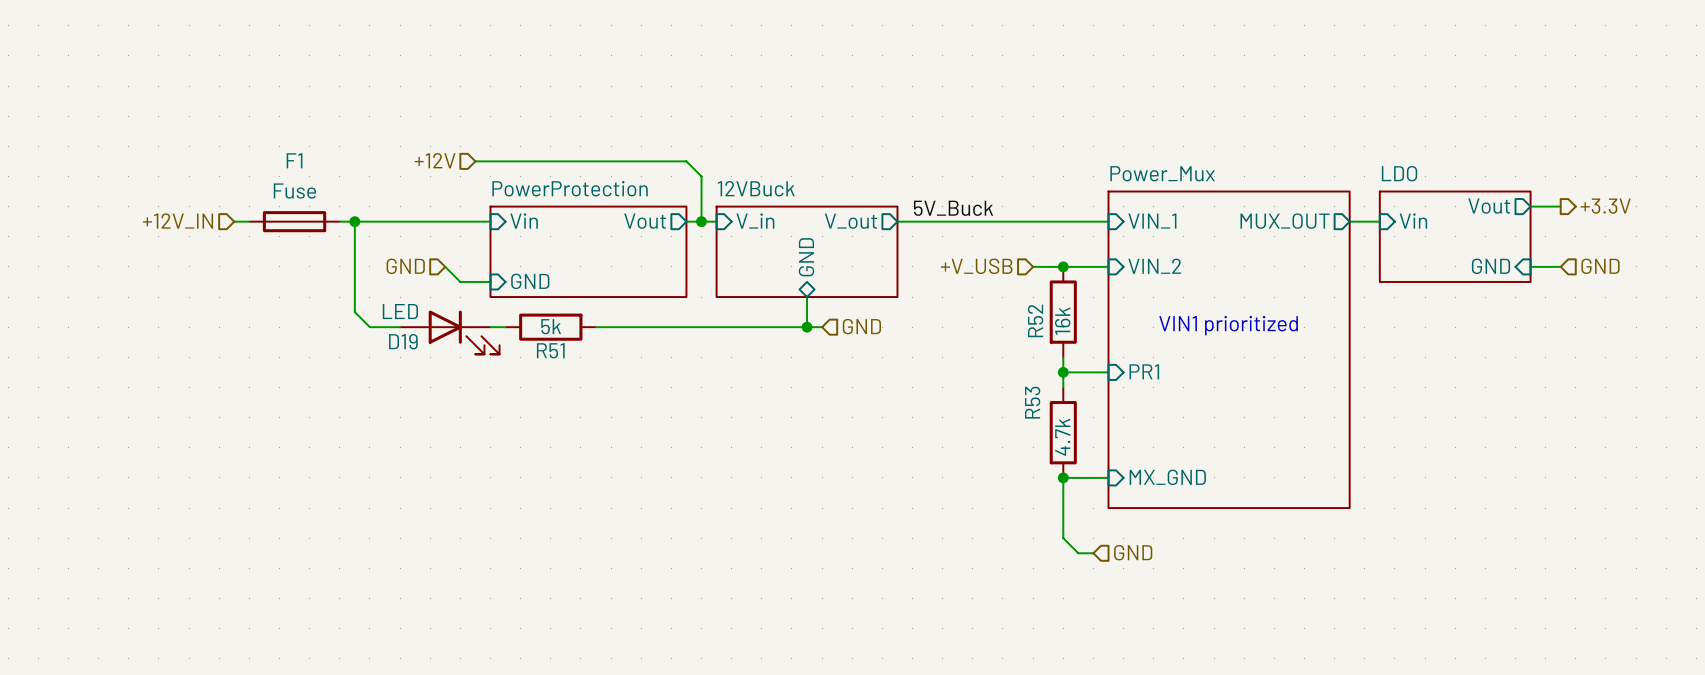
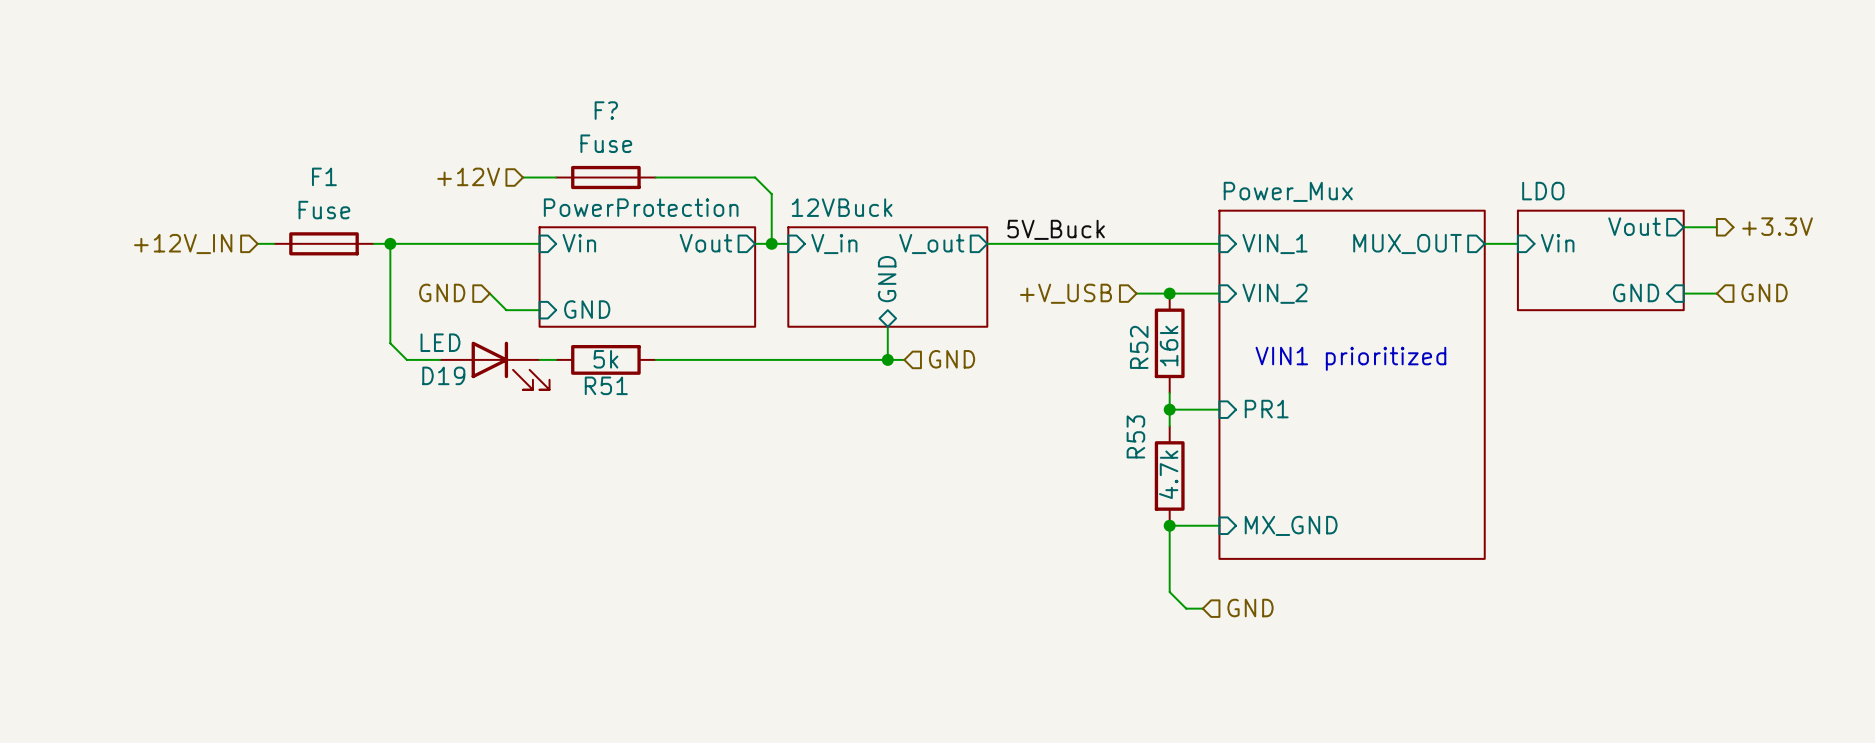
F?: none -> Fuse (605, 177)

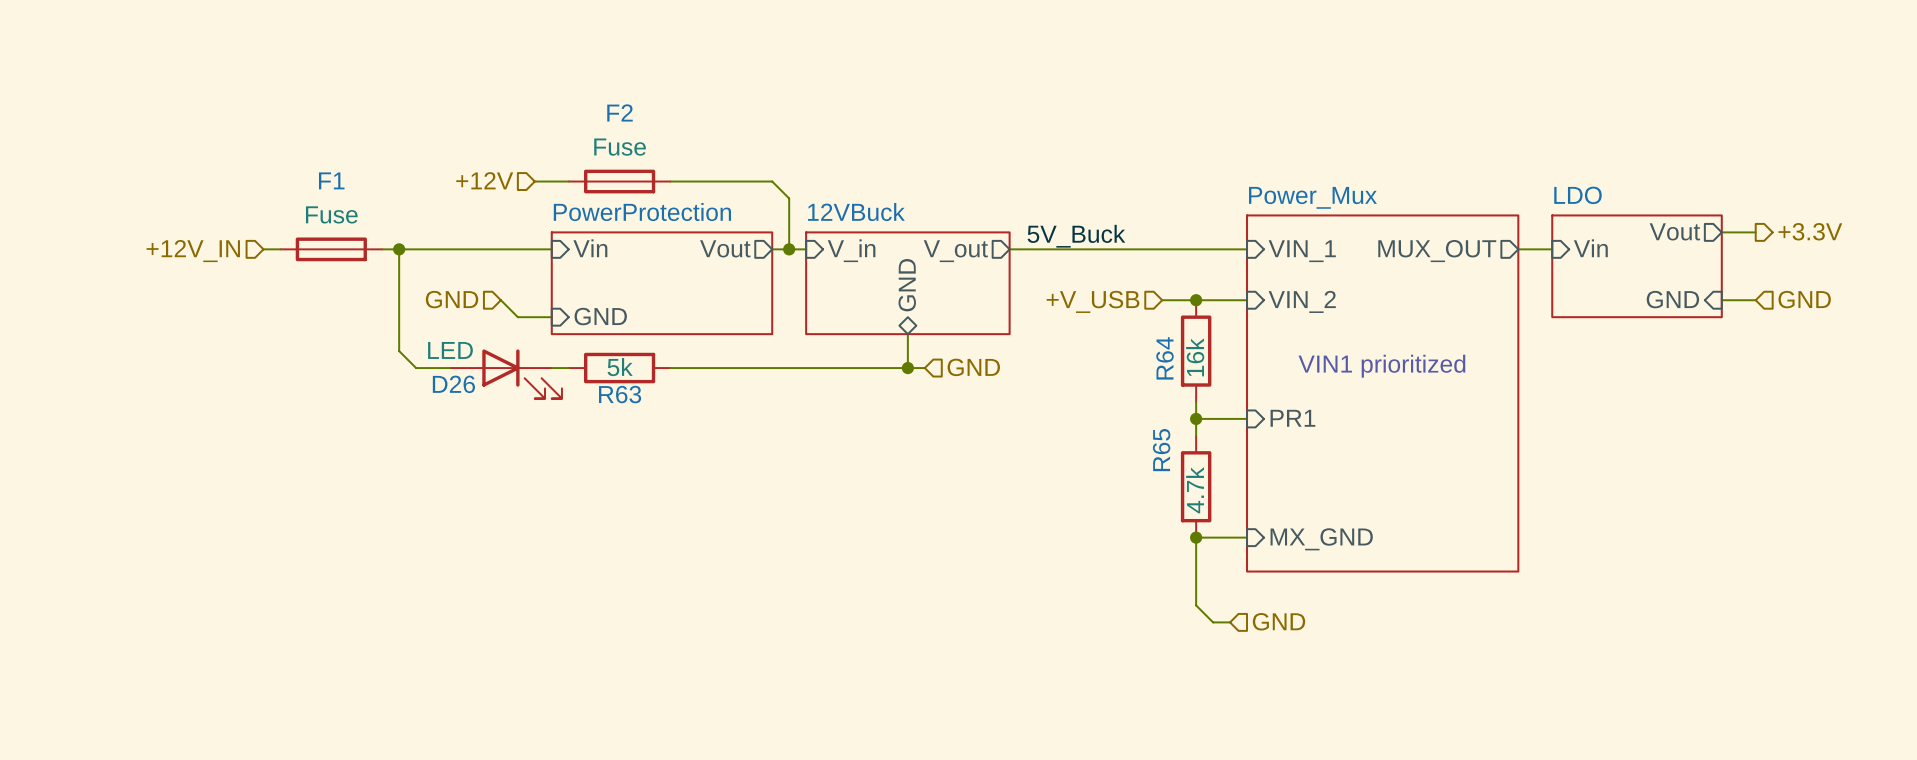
F? name: F? (606, 110) -> F2 (620, 112)
R52 name: R52 (1139, 347) -> R64 (1164, 358)
D19 name: D19 (443, 375) -> D26 (453, 384)
R51 name: R51 (606, 385) -> R63 (620, 394)
R53 name: R53 (1135, 436) -> R65 (1161, 450)

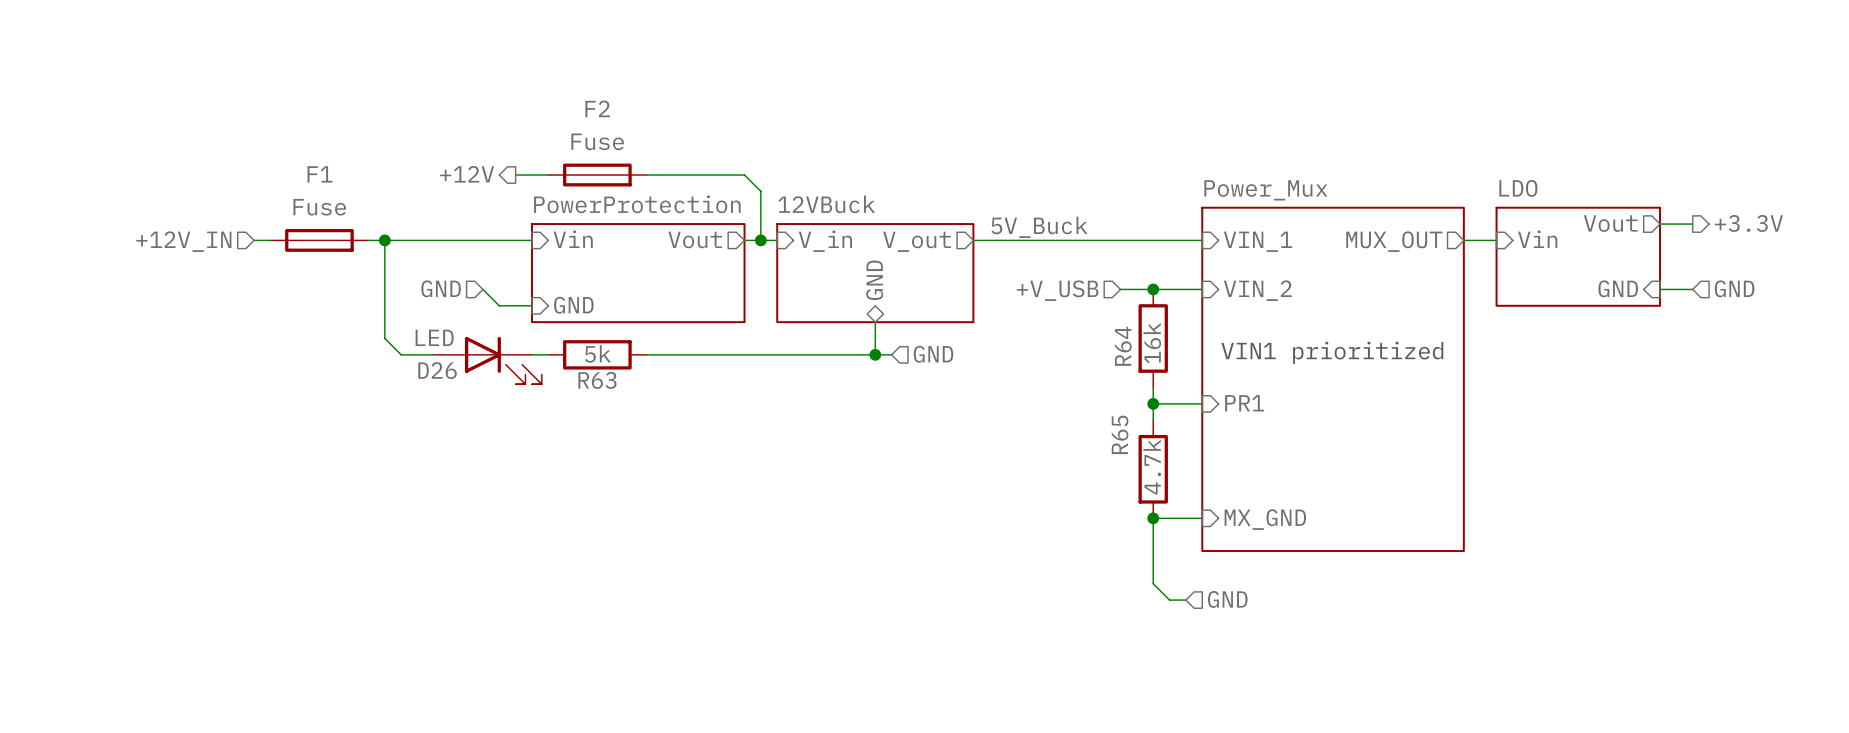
hierarchical label shape: input (484, 180) -> output (467, 174)

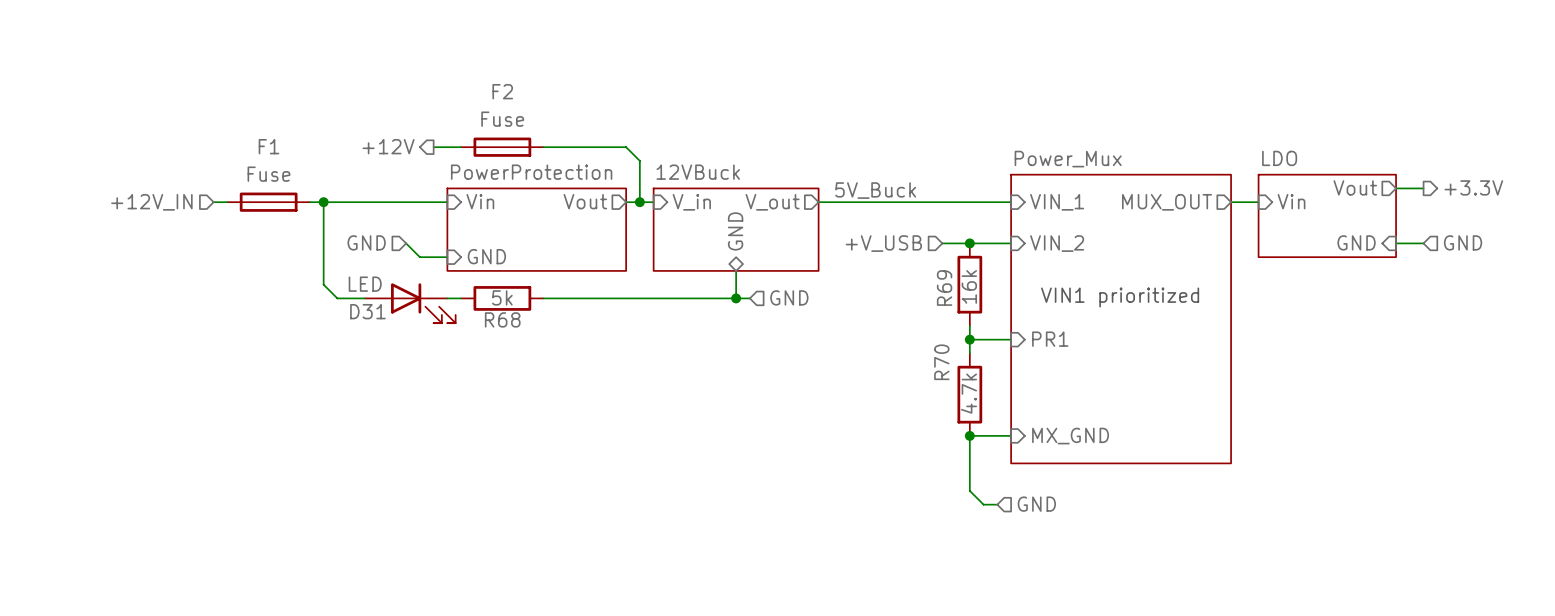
R64 name: R64 (1123, 346) -> R69 (944, 288)
D26 name: D26 (437, 370) -> D31 (367, 311)
R63 name: R63 (597, 380) -> R68 (502, 319)
R65 name: R65 (1120, 434) -> R70 (941, 362)

